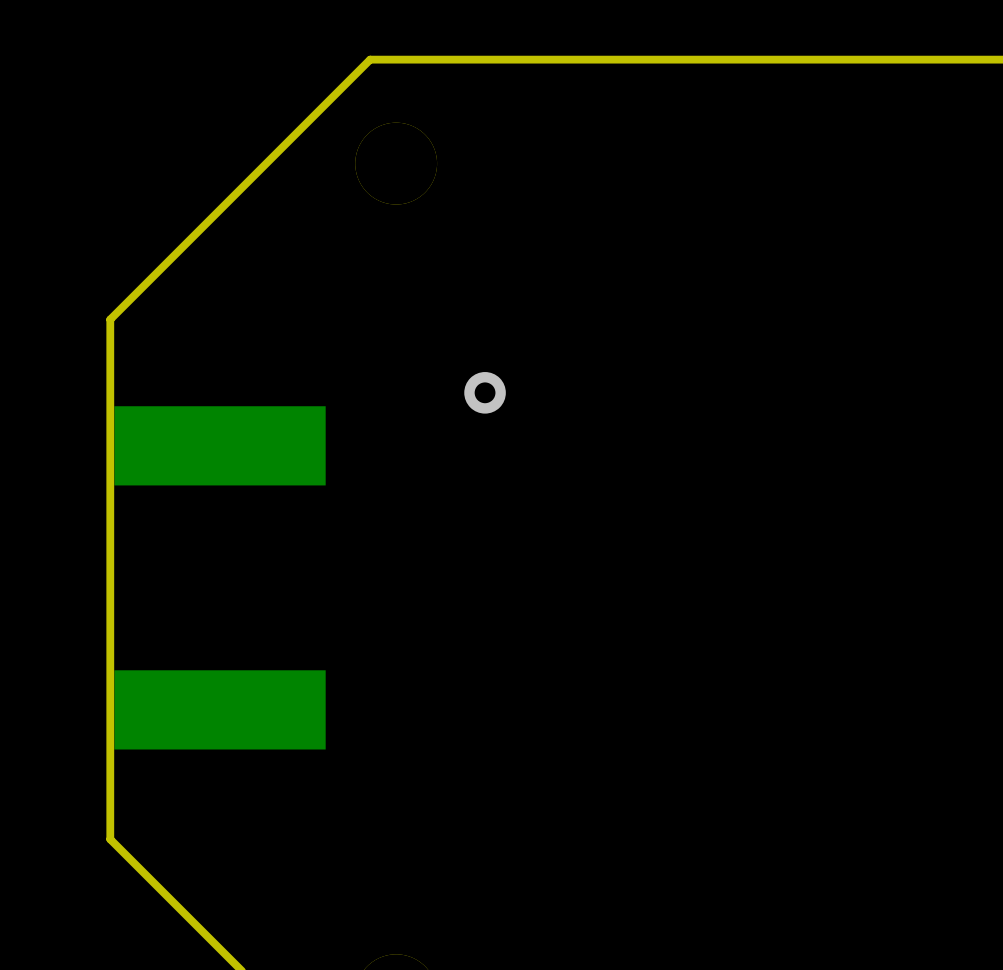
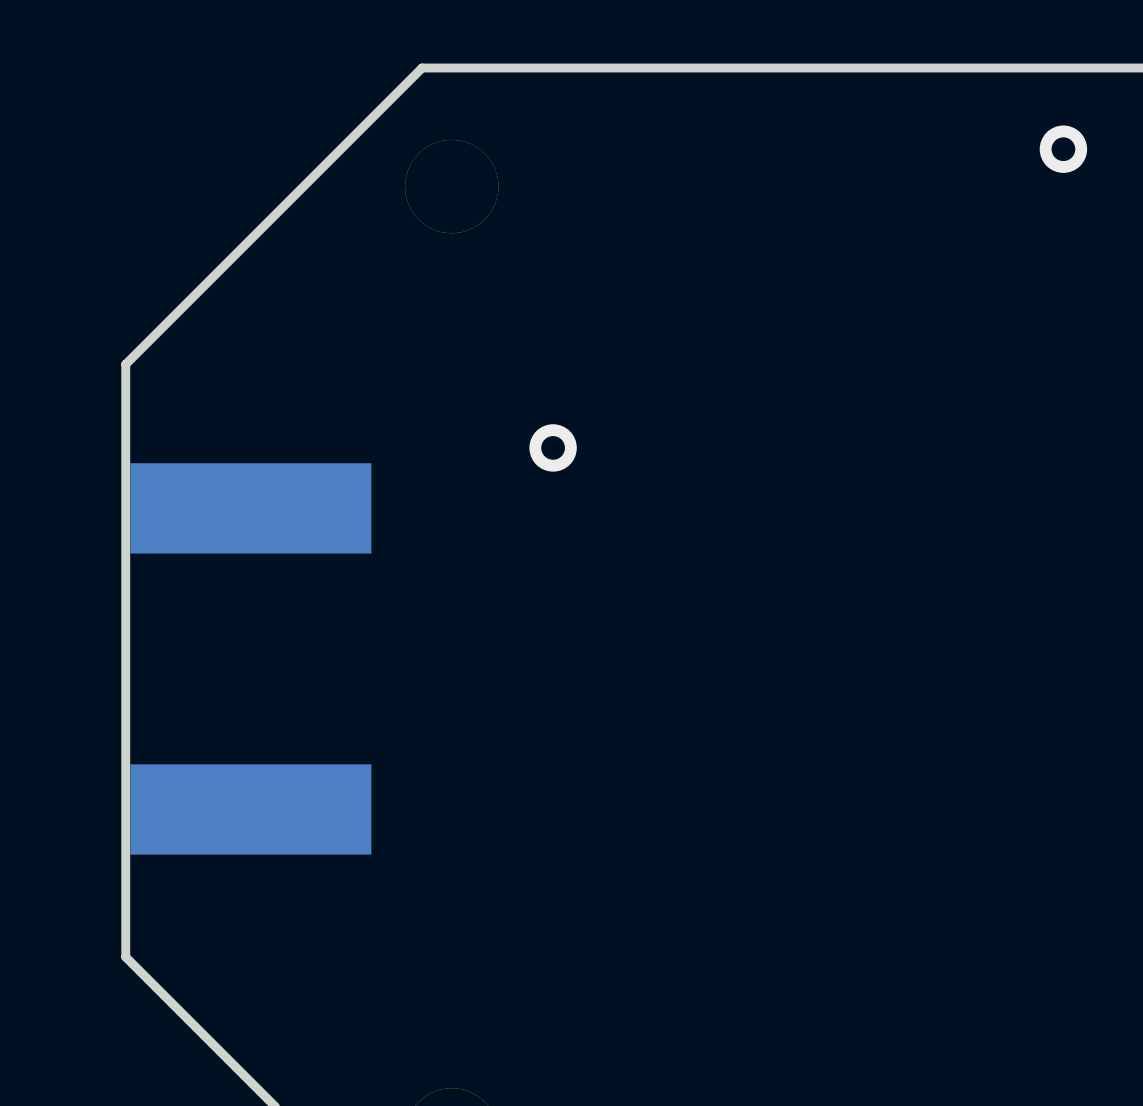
via: none -> (1063, 149)

